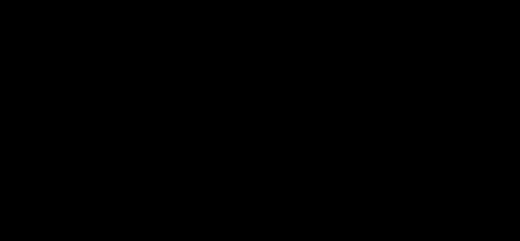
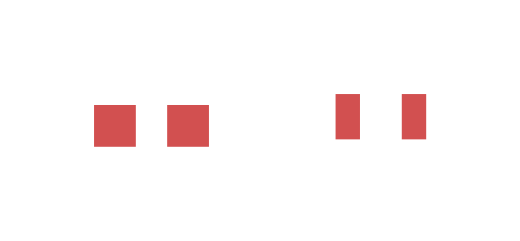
part: none -> (380, 116)
part: none -> (151, 125)

